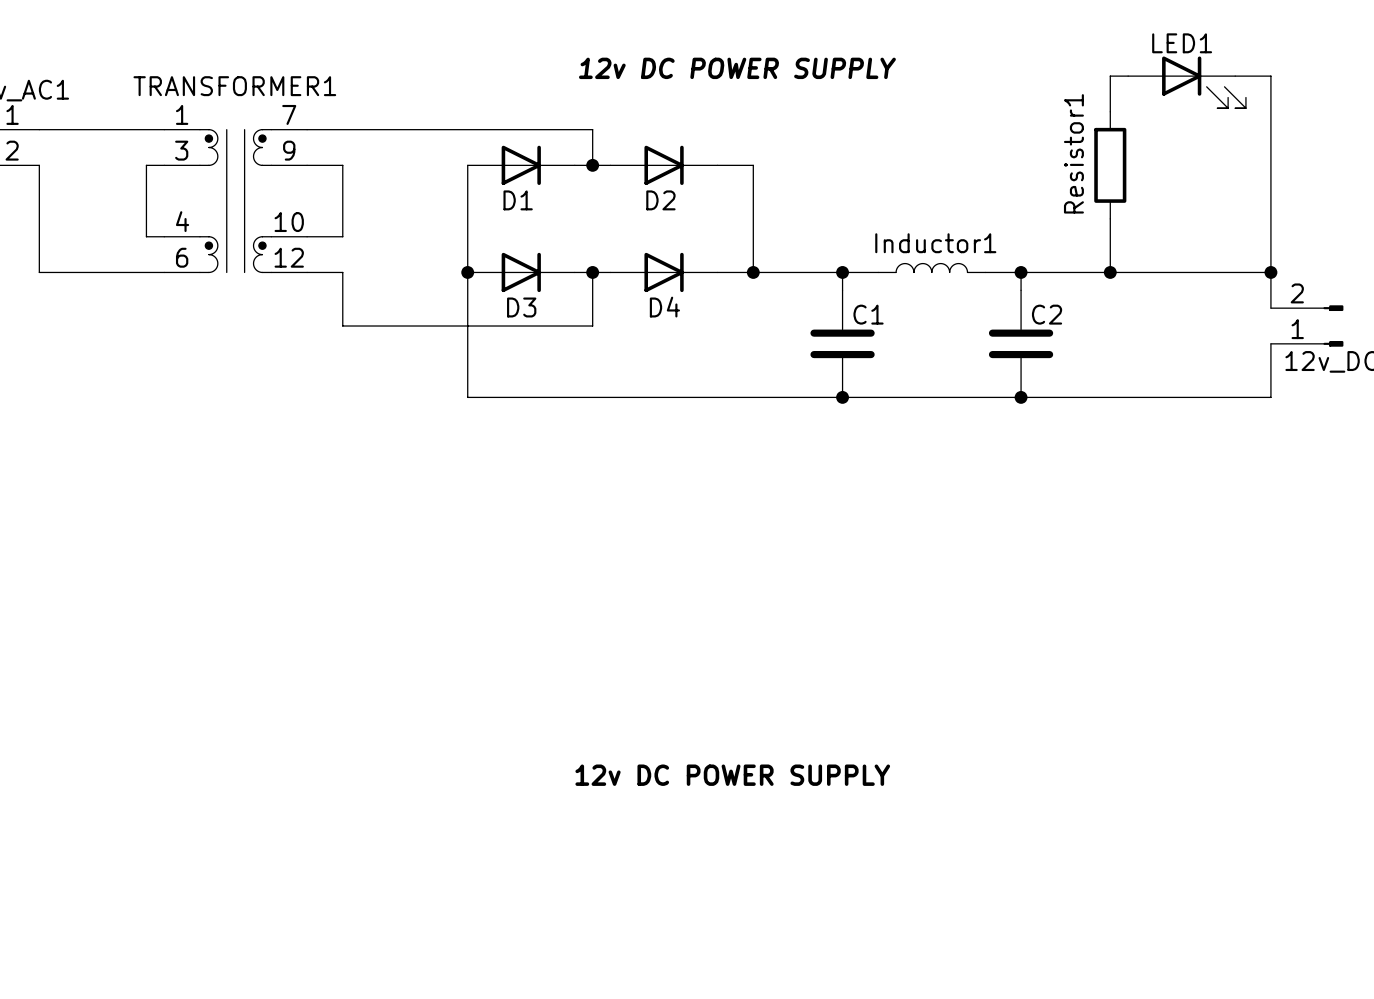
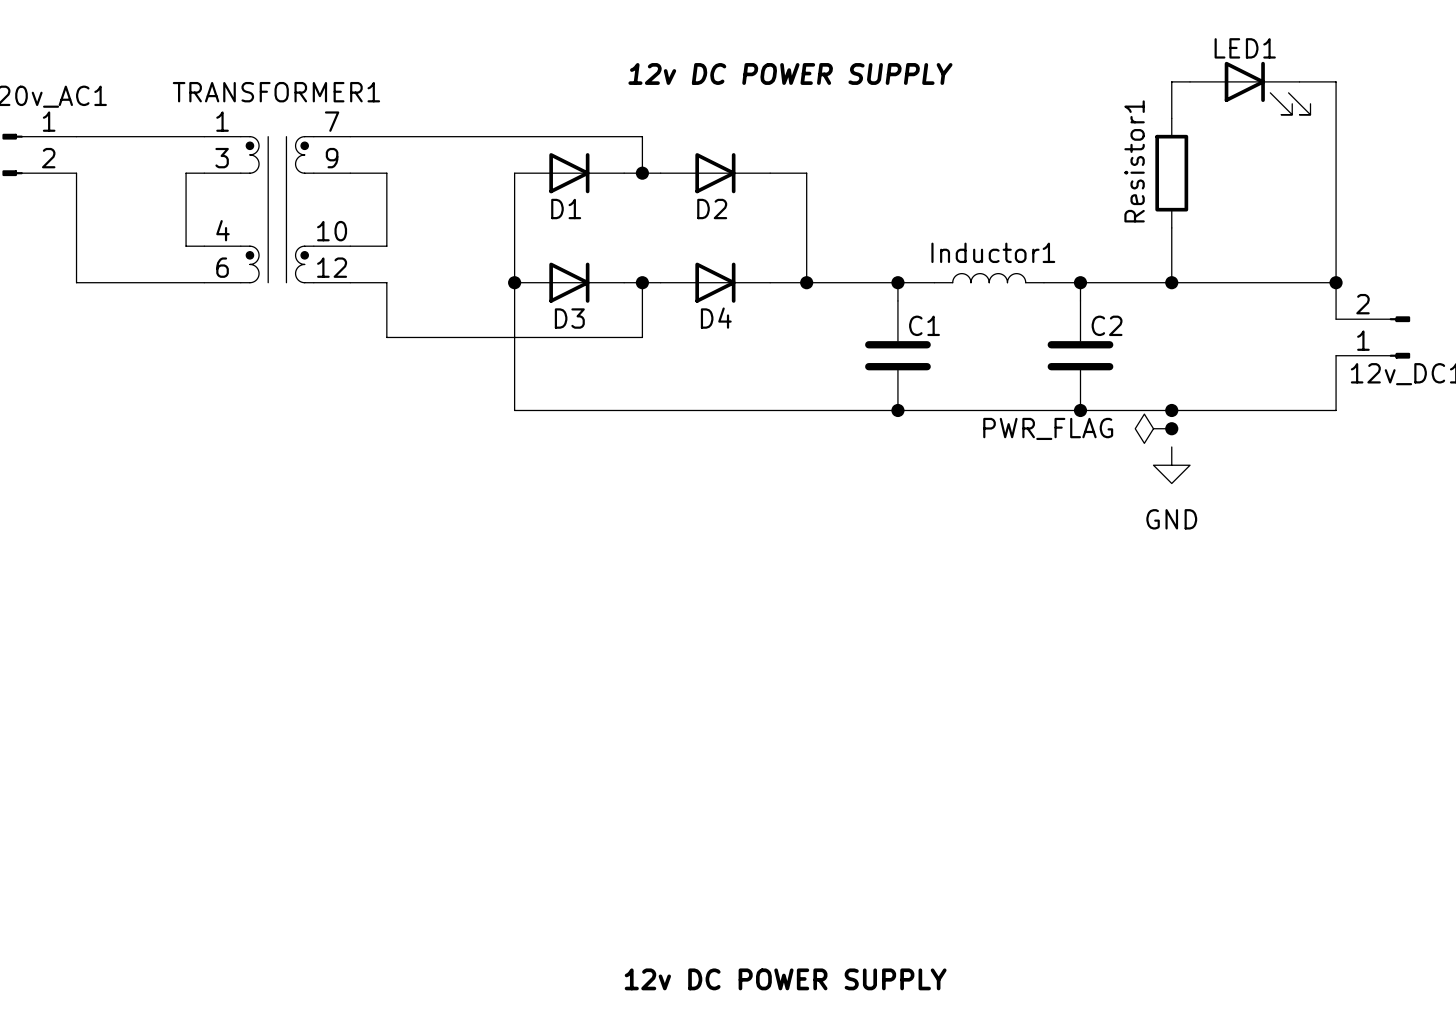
junction: none -> (1171, 410)
power symbol: none -> PWR_FLAG (1153, 428)
junction: none -> (1171, 428)
power symbol: none -> GND (1171, 465)
text position: 12v DC POWER SUPPLY (732, 775) -> 12v DC POWER SUPPLY (785, 979)

